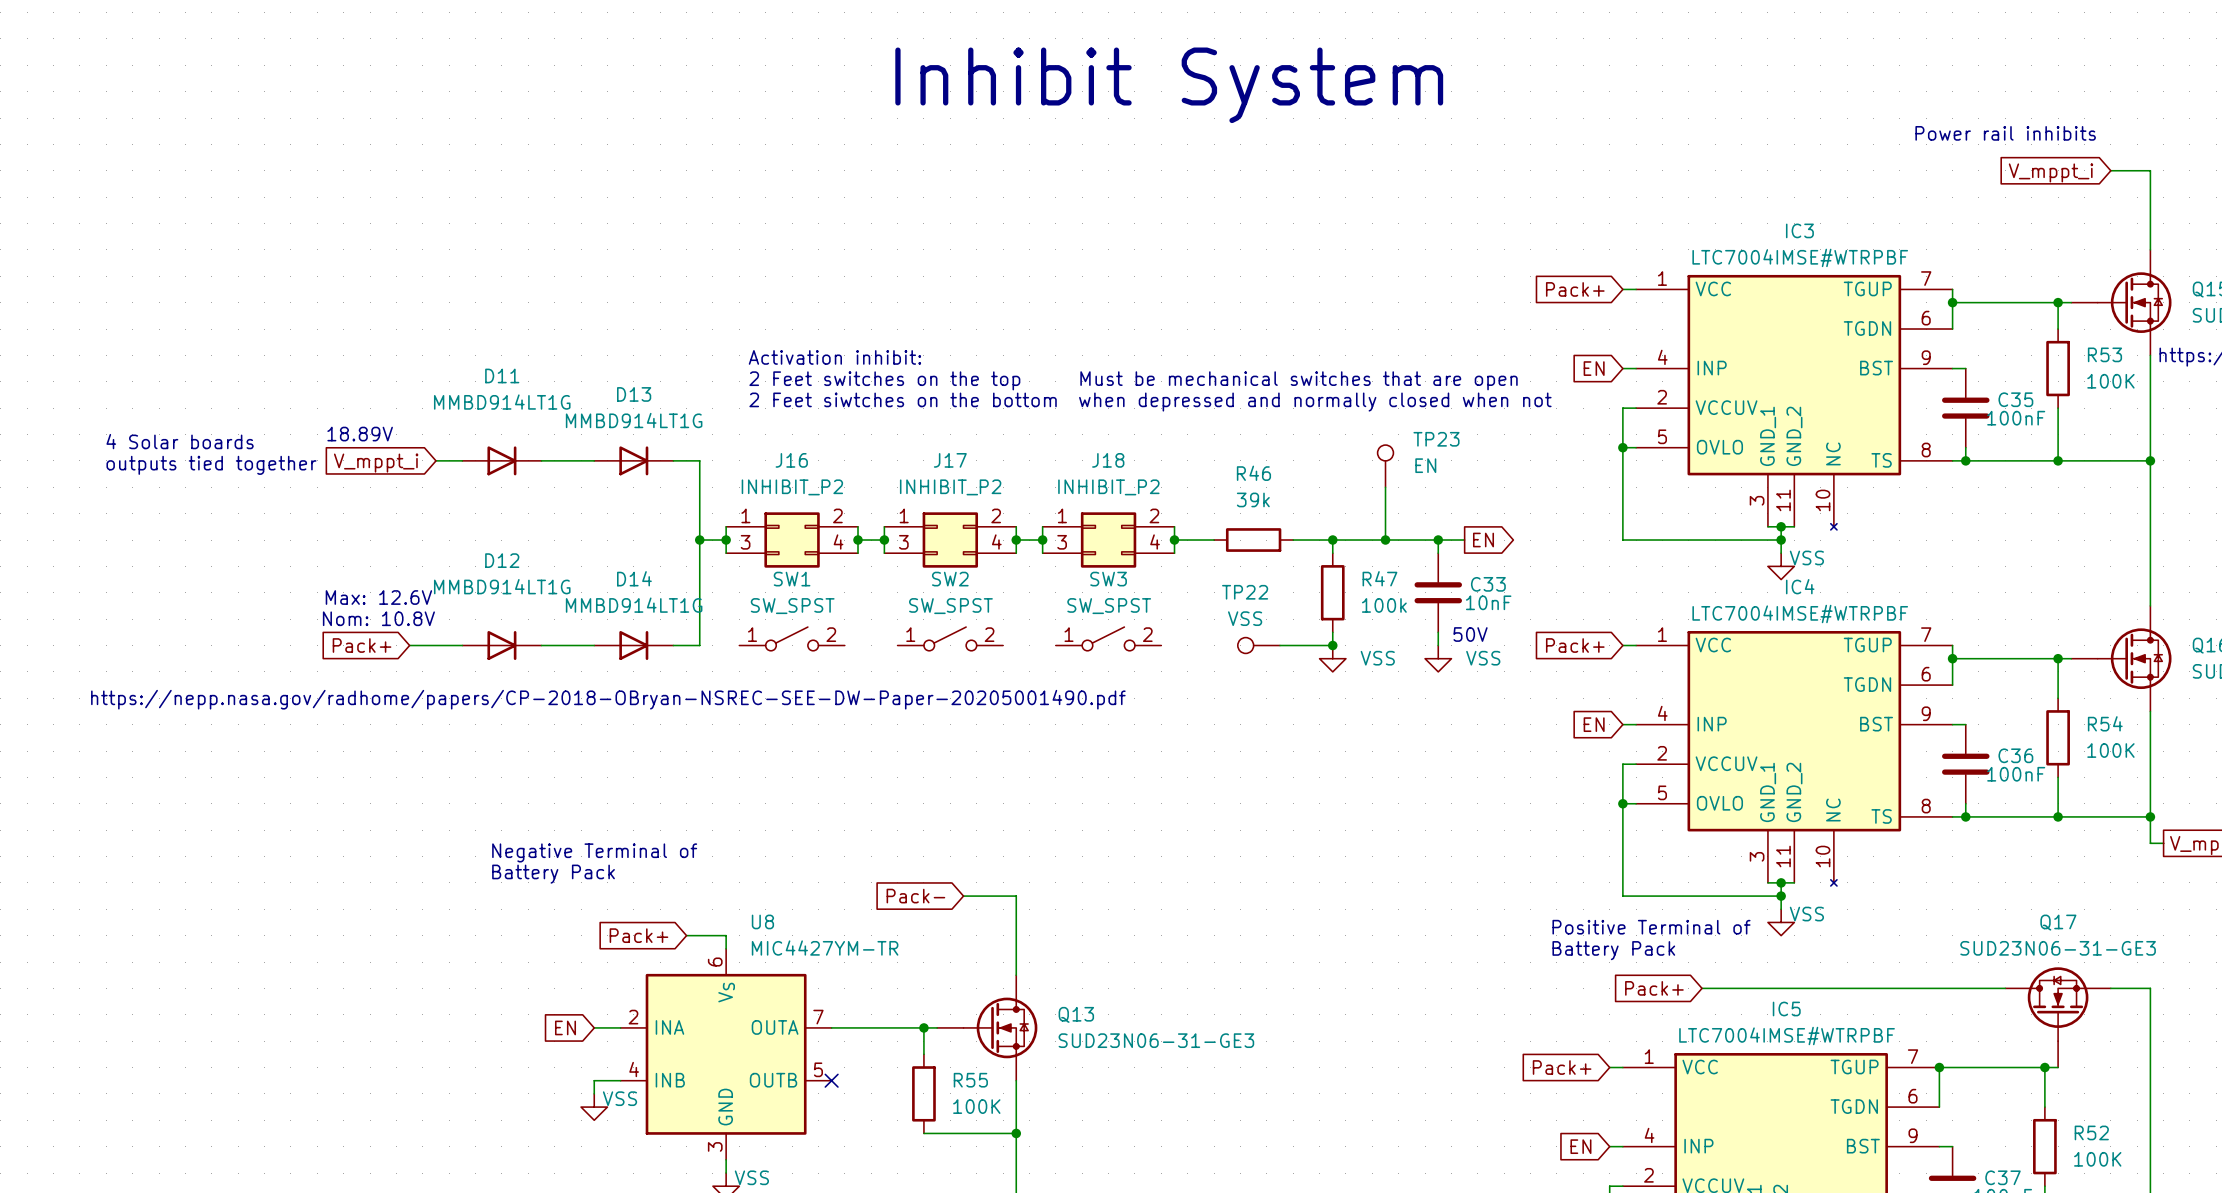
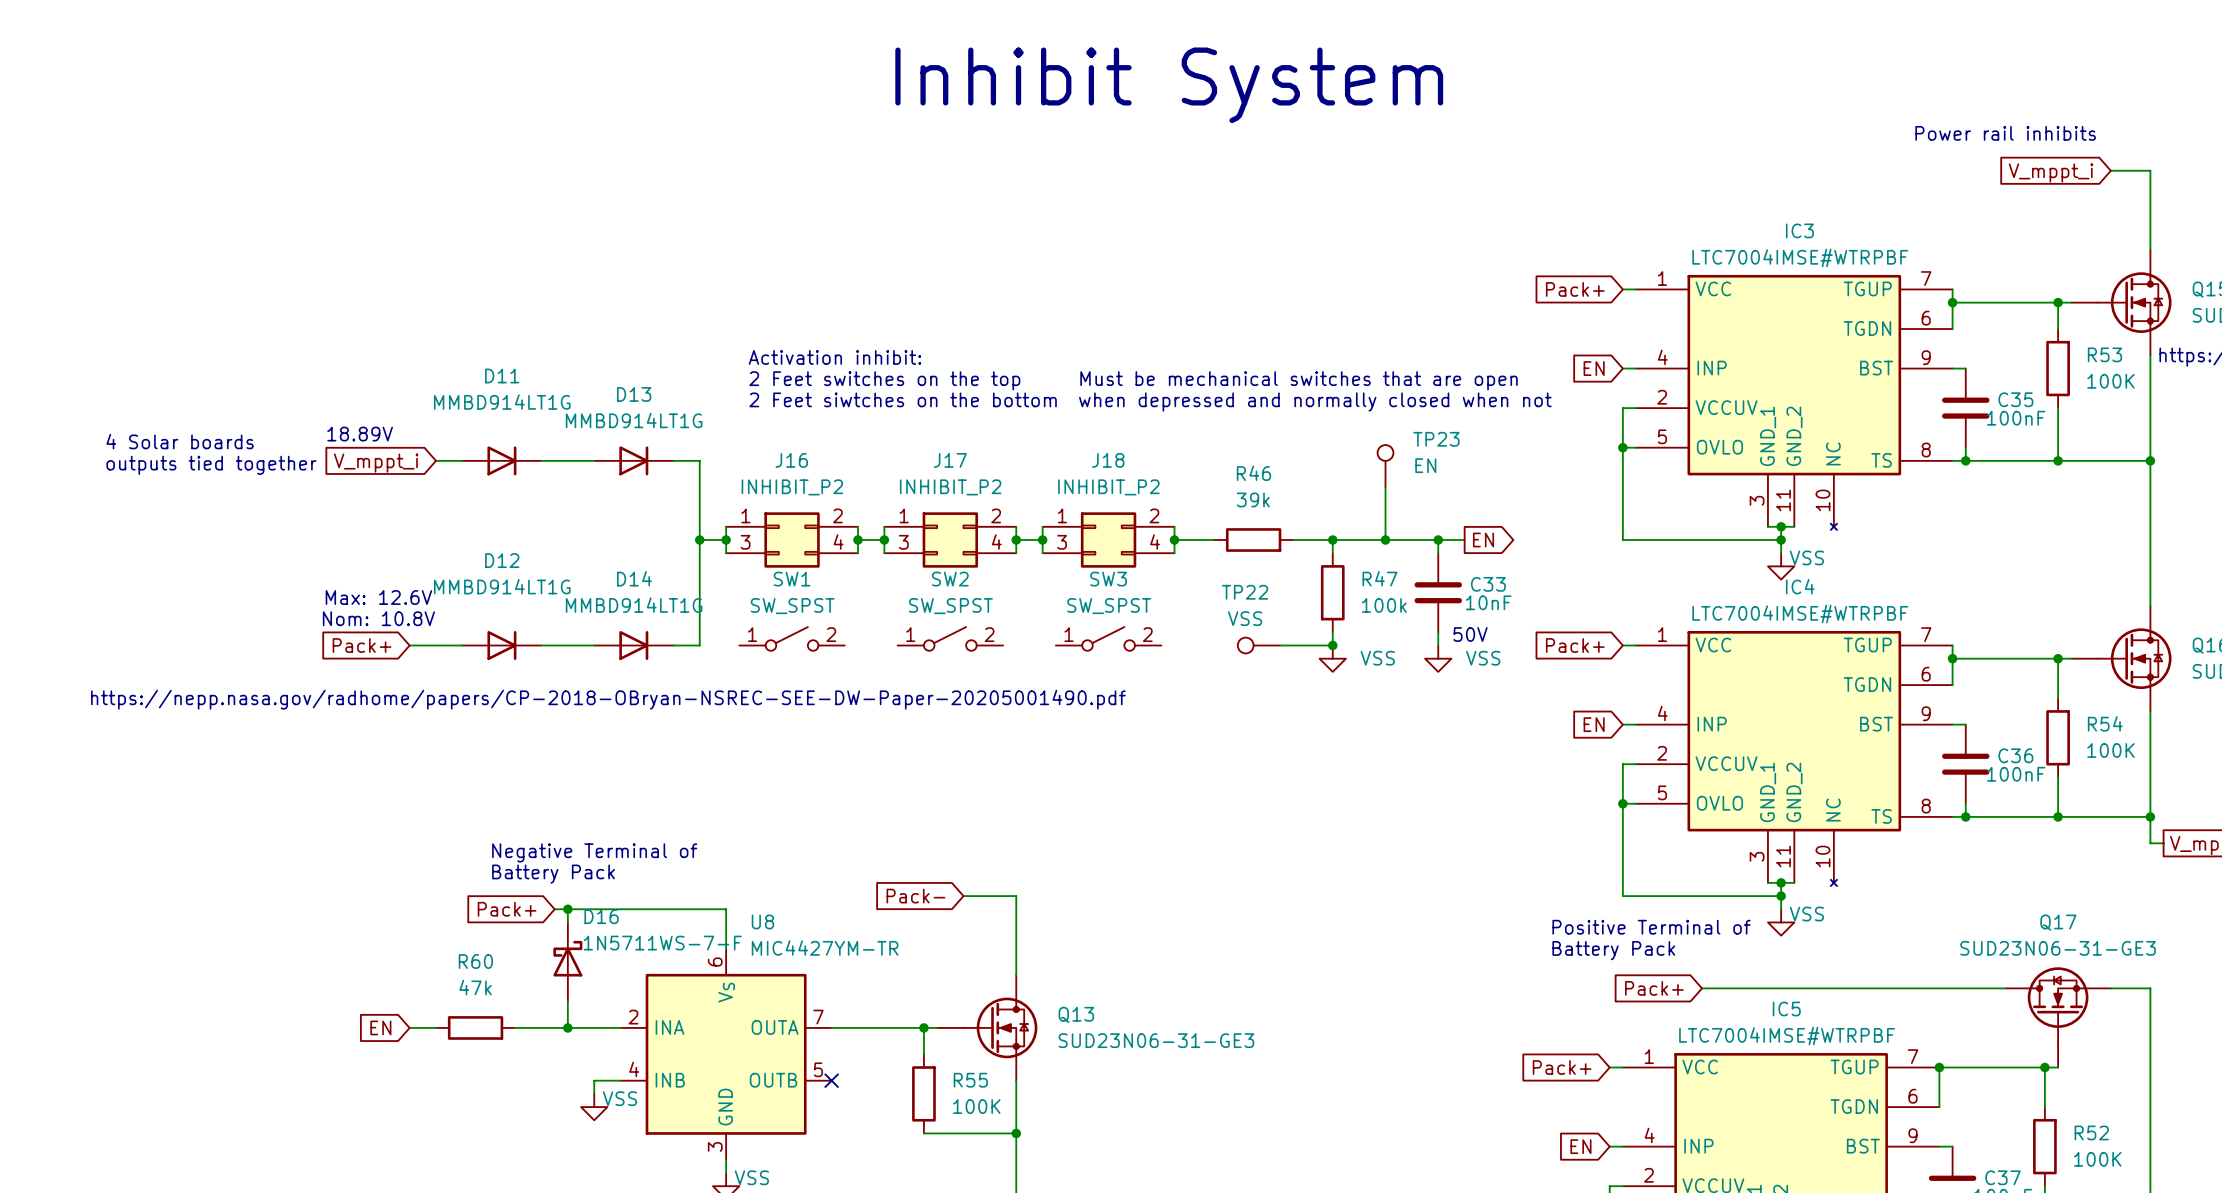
wire: none -> (567, 909) (567, 922)
junction: none -> (567, 909)
global label position: Pack+ (638, 935) -> Pack+ (507, 909)
wire: (686, 935) (726, 935) -> (554, 909) (726, 909) (726, 935)
D16: none -> 1N5711WS-7-F (567, 962)
wire: none -> (567, 1001) (567, 1027)
wire: none -> (409, 1027) (436, 1027)
R60: none -> 47k (475, 1027)
wire: none -> (515, 1027) (594, 1027)
global label position: EN (565, 1027) -> EN (380, 1027)
junction: none -> (567, 1027)

